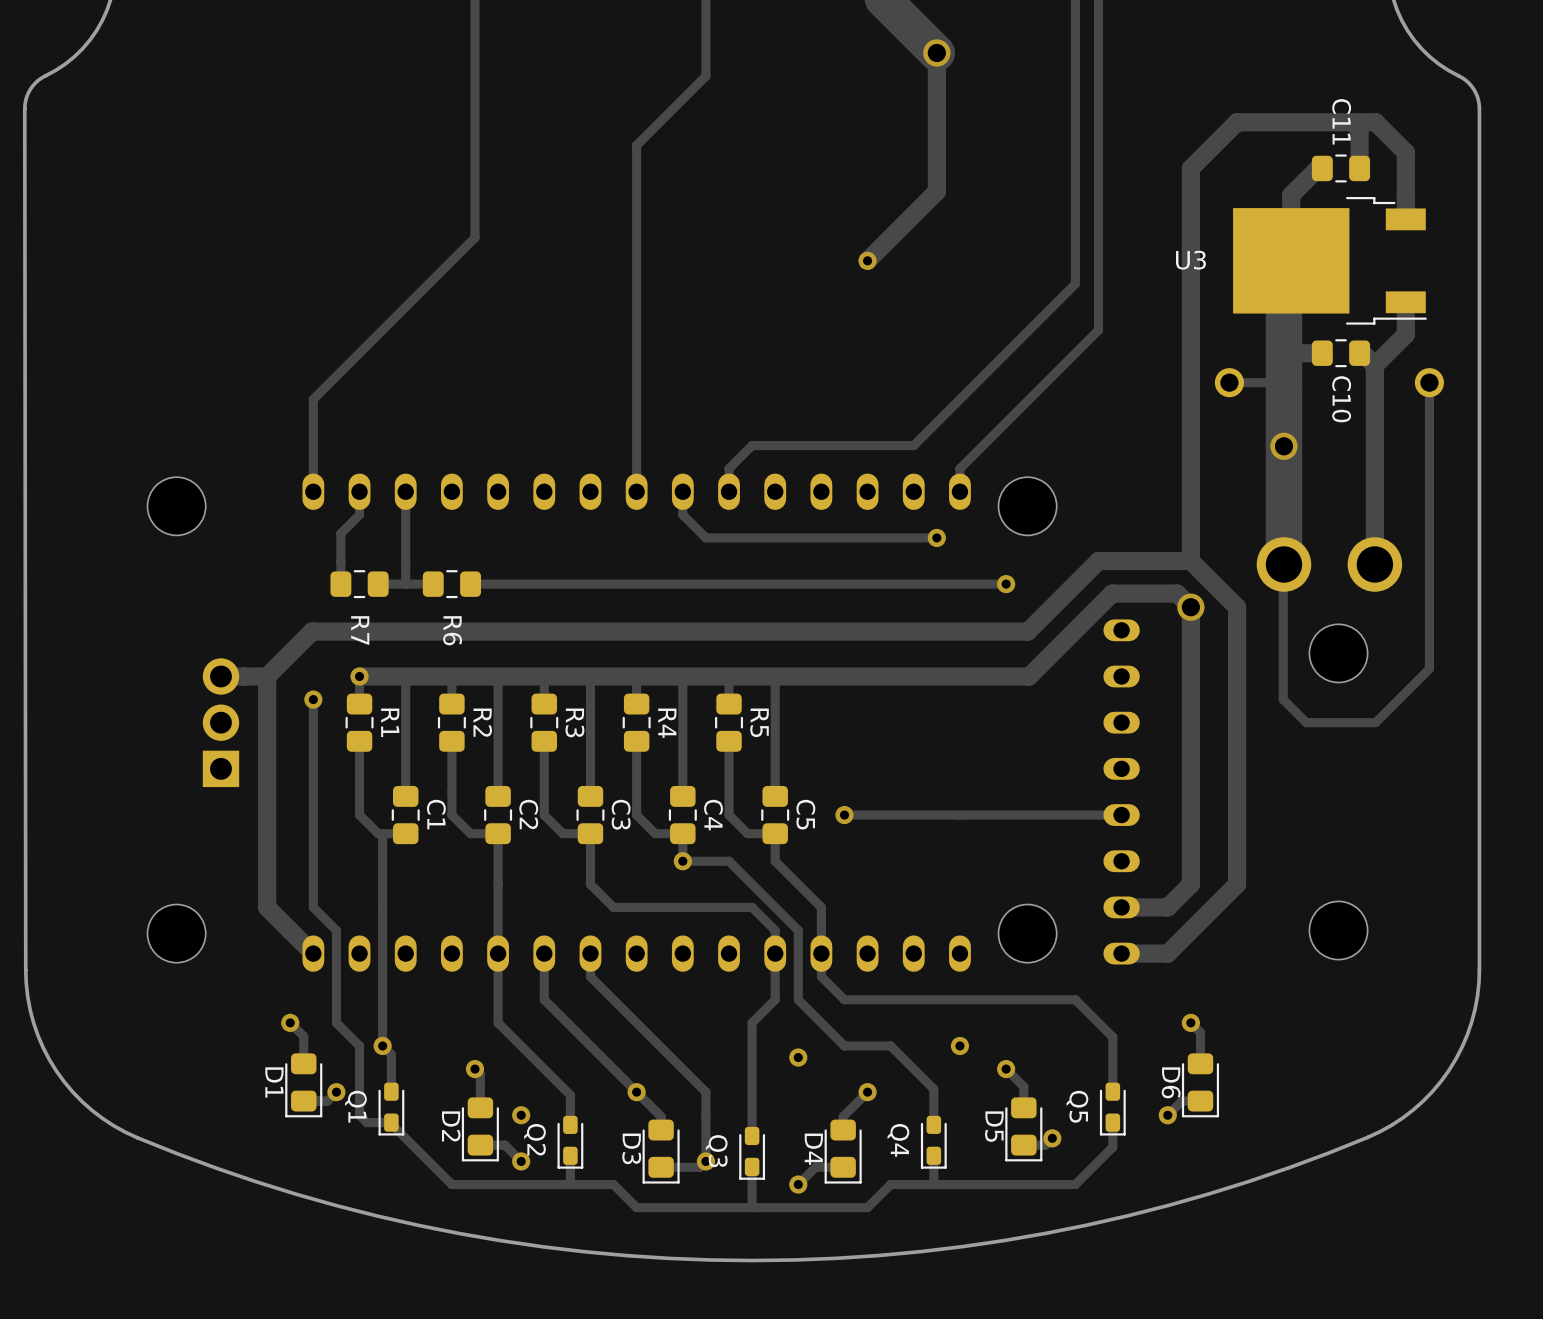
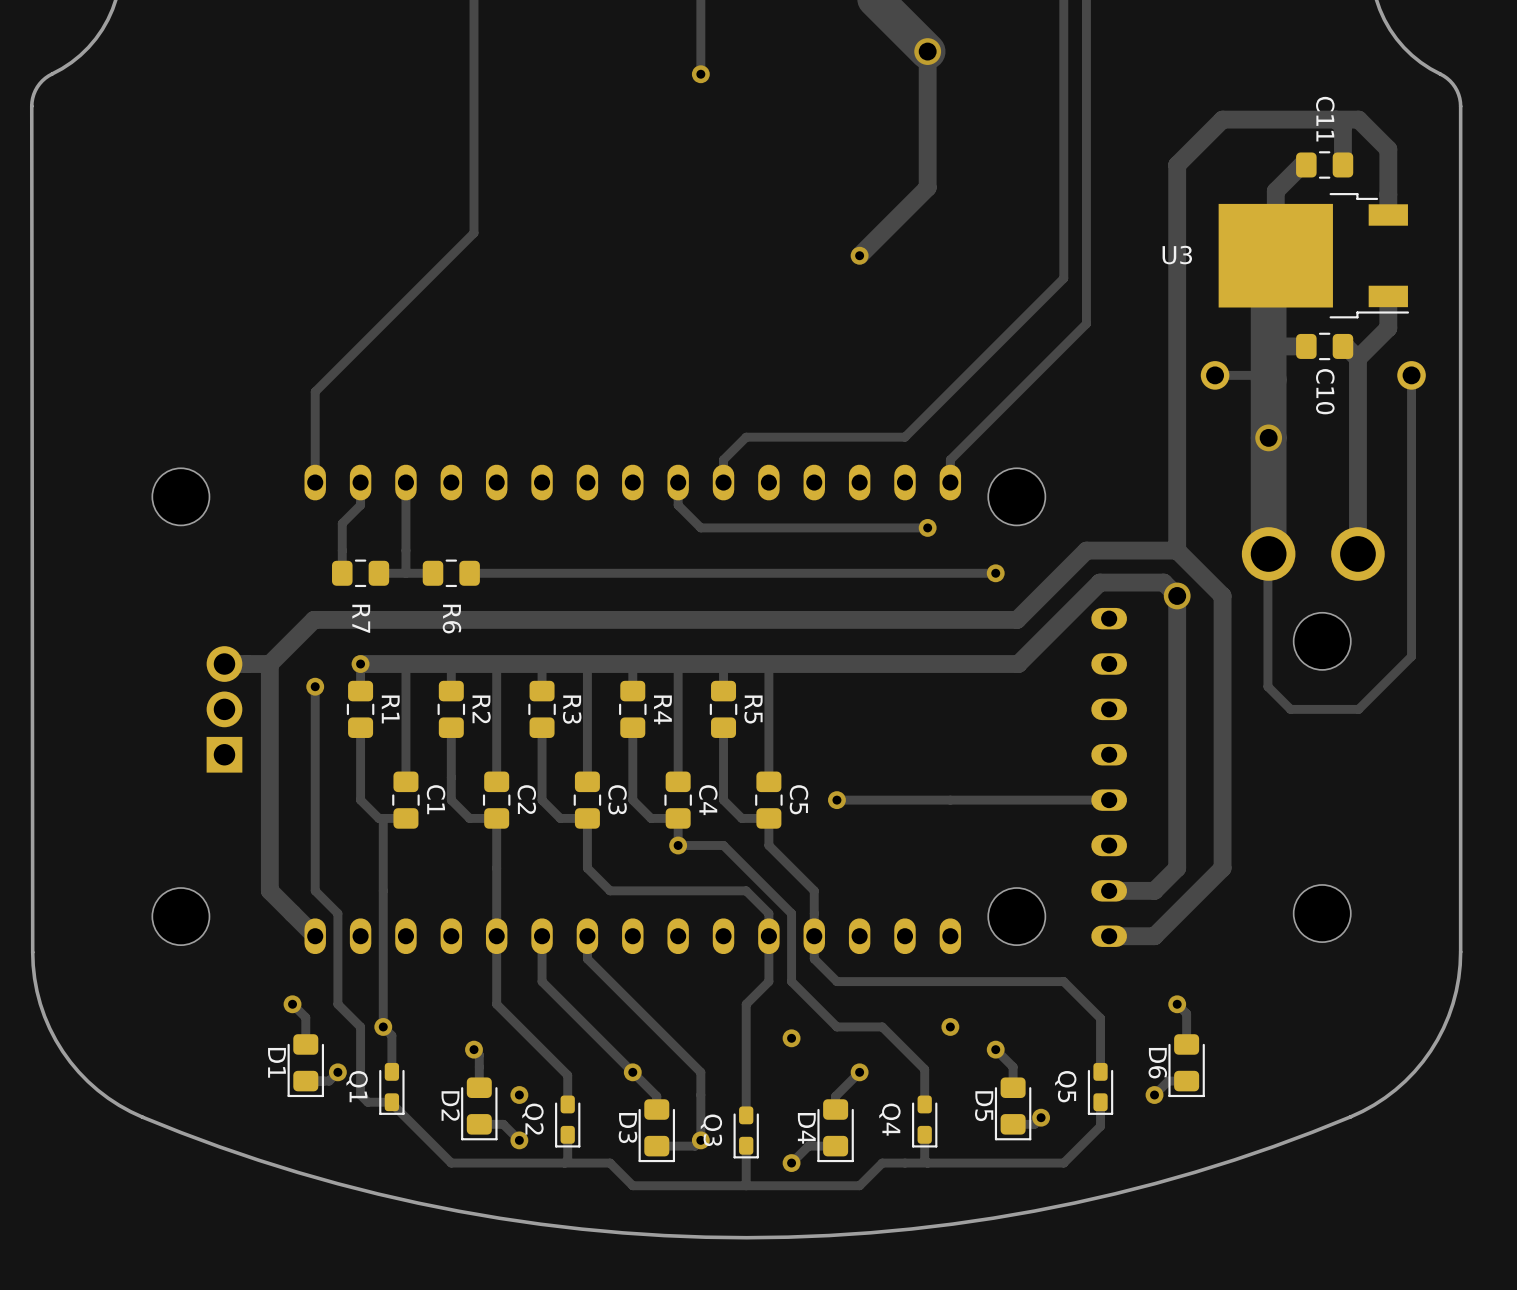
track: (705, 76) (636, 145) (636, 491) -> none
via: none -> (700, 74)

